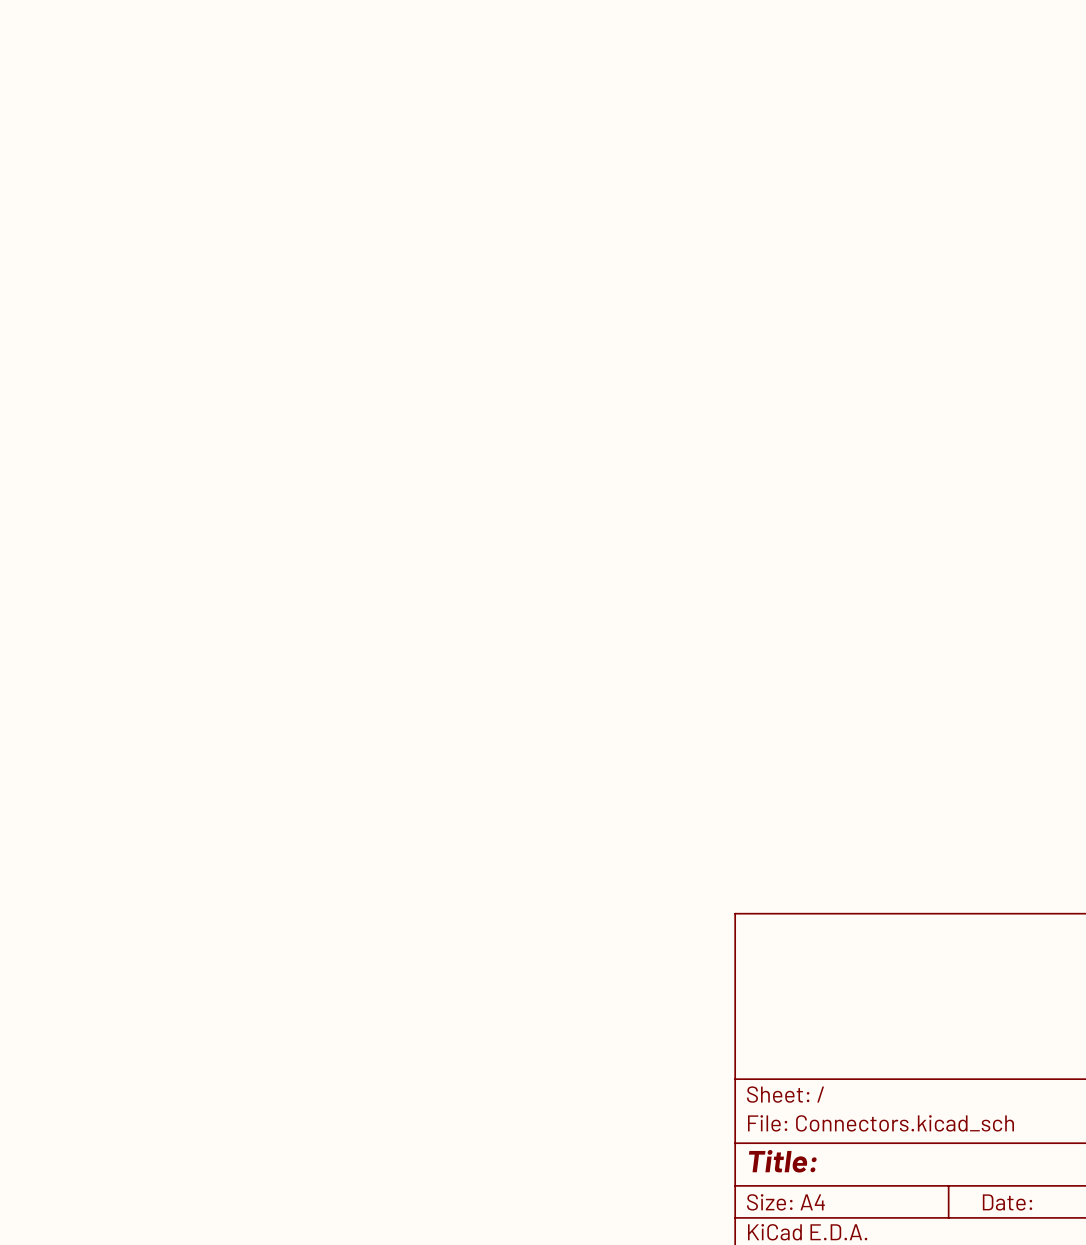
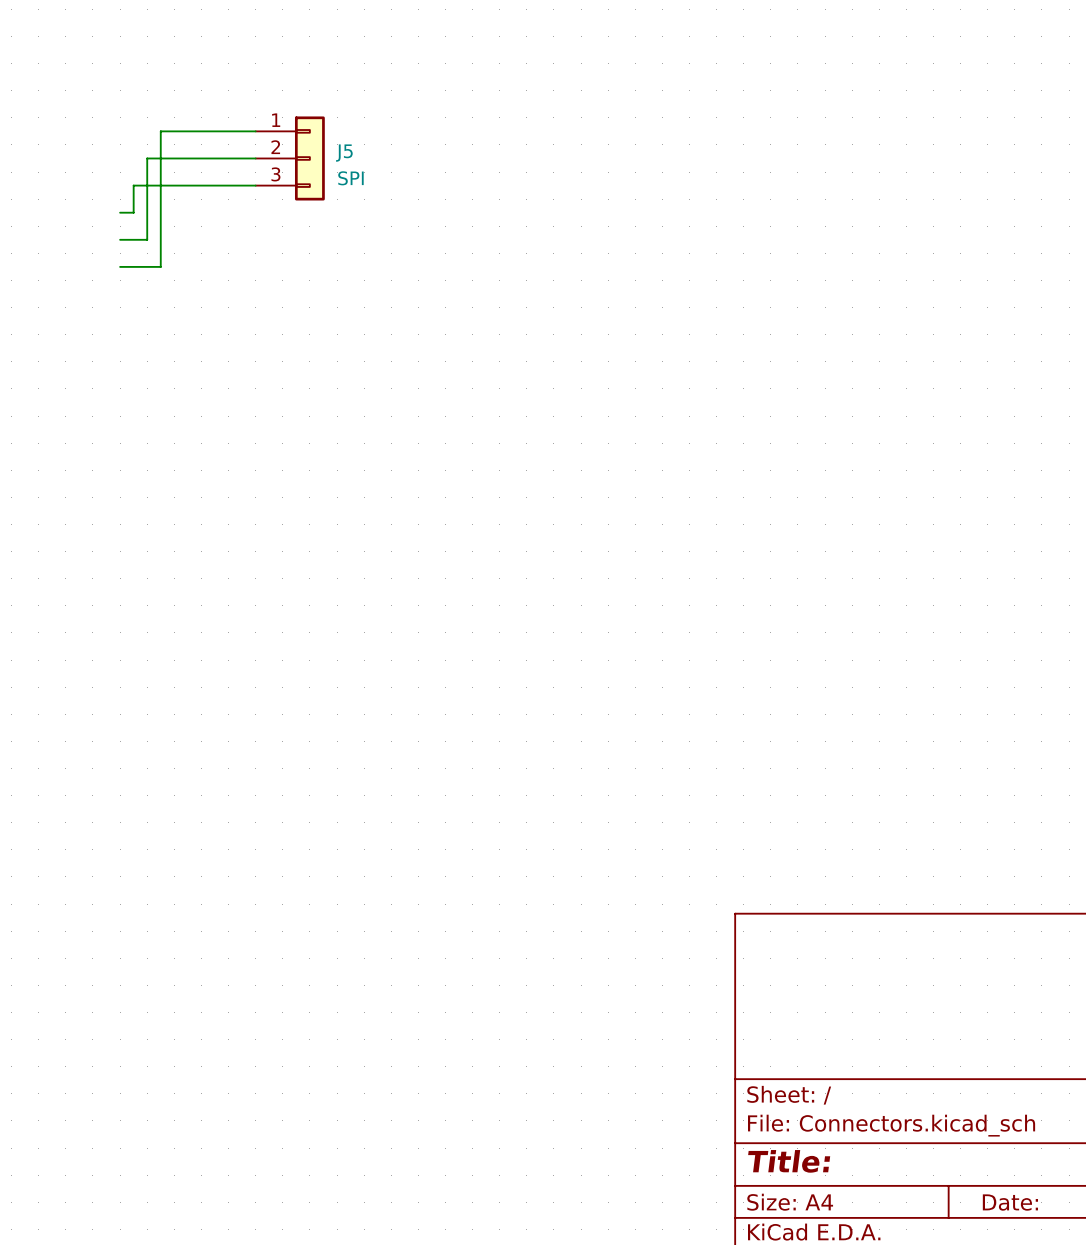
wire: none -> (255, 131) (160, 131) (160, 266) (120, 266)
wire: none -> (255, 158) (147, 158) (147, 239) (120, 239)
J5: none -> SPI (290, 158)
wire: none -> (255, 185) (133, 185) (133, 212) (120, 212)

